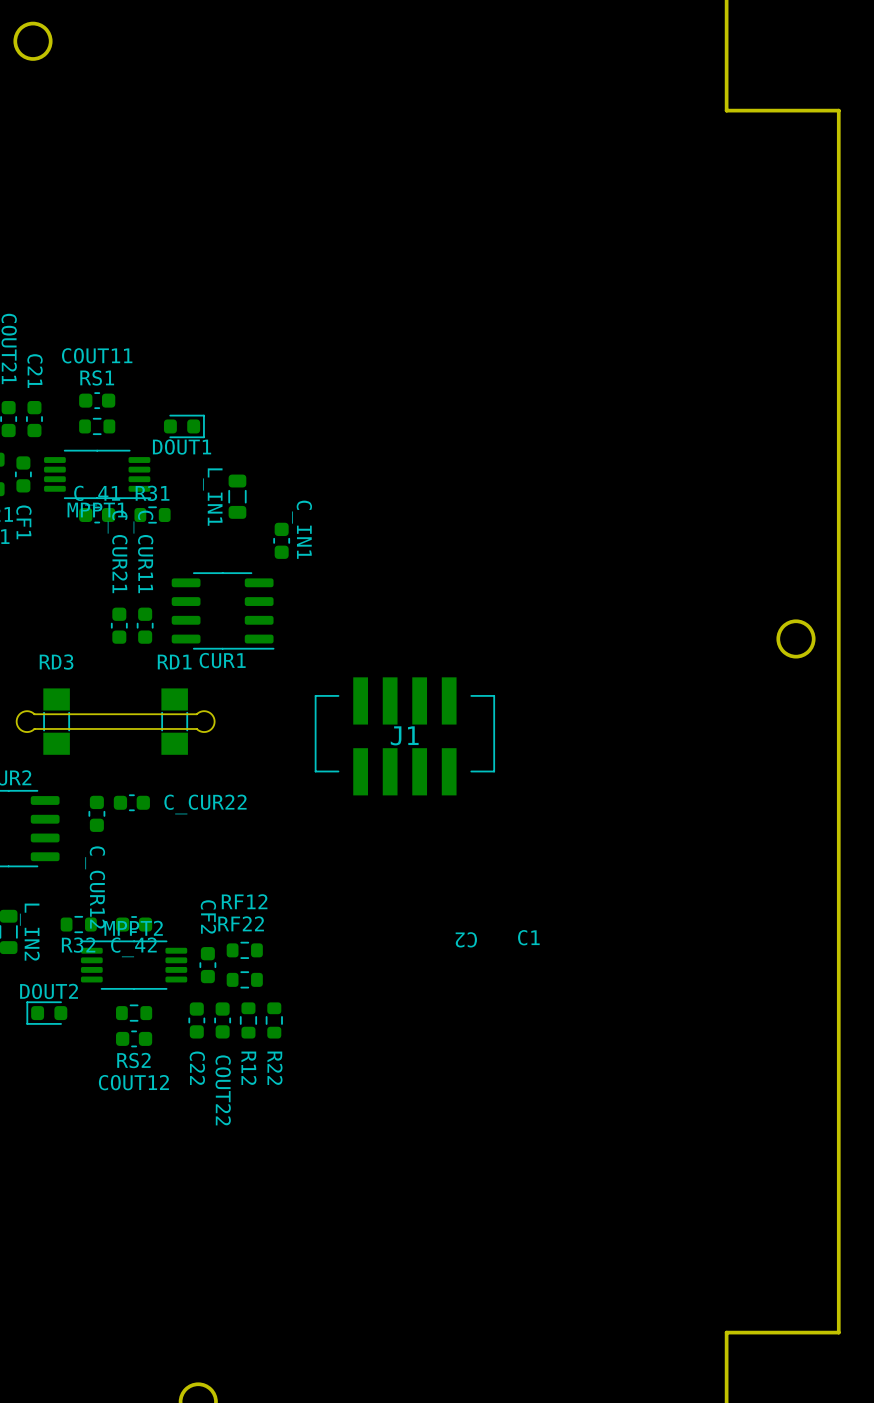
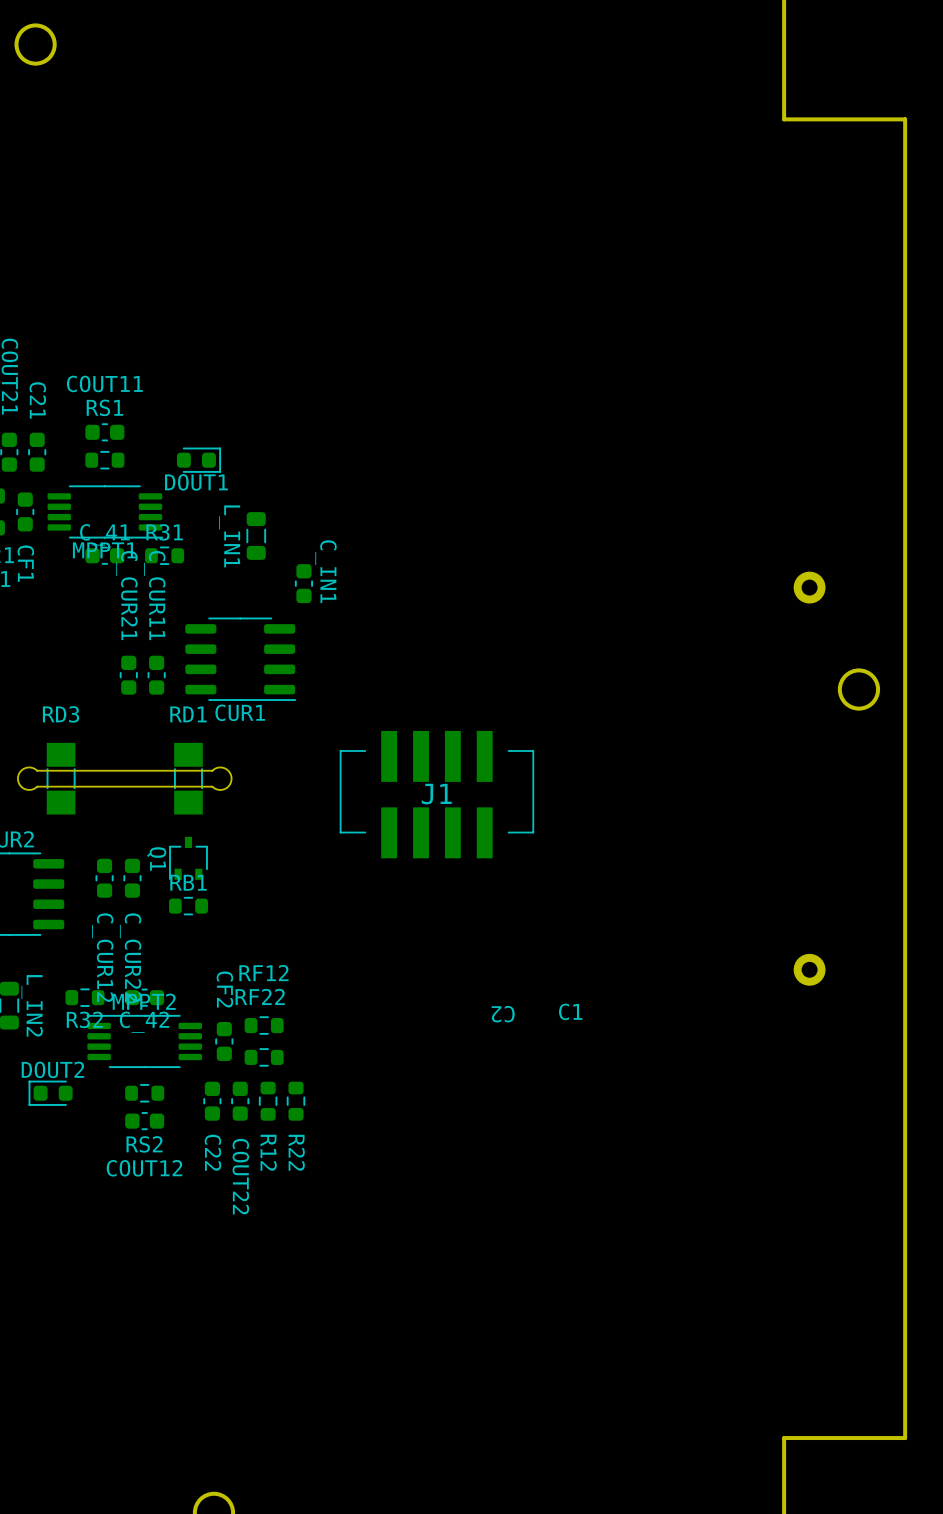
part: none -> (809, 587)
Q1: none -> (188, 858)
C_CUR22 rotation: 0° (131, 802) -> 90° clockwise (132, 878)
RB1: none -> (188, 906)
part: none -> (809, 969)

